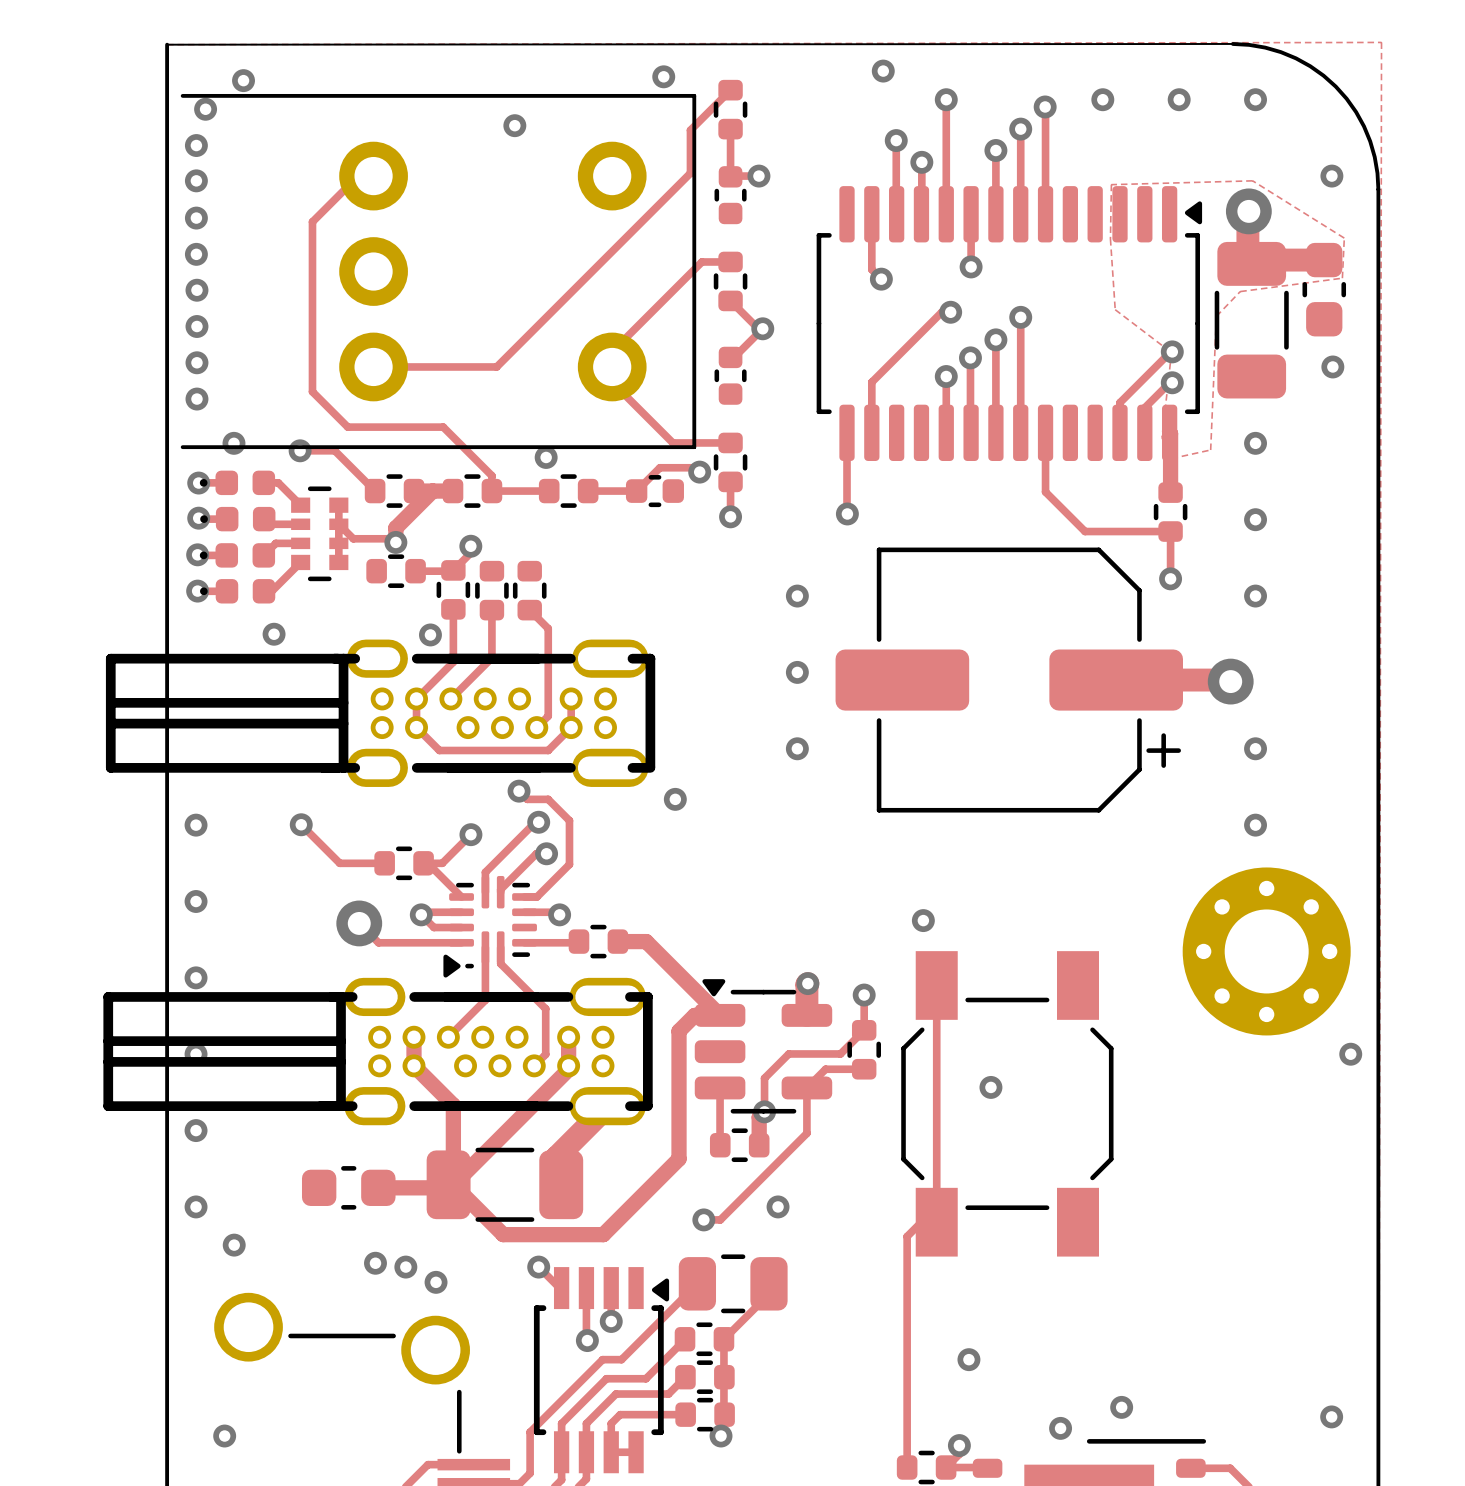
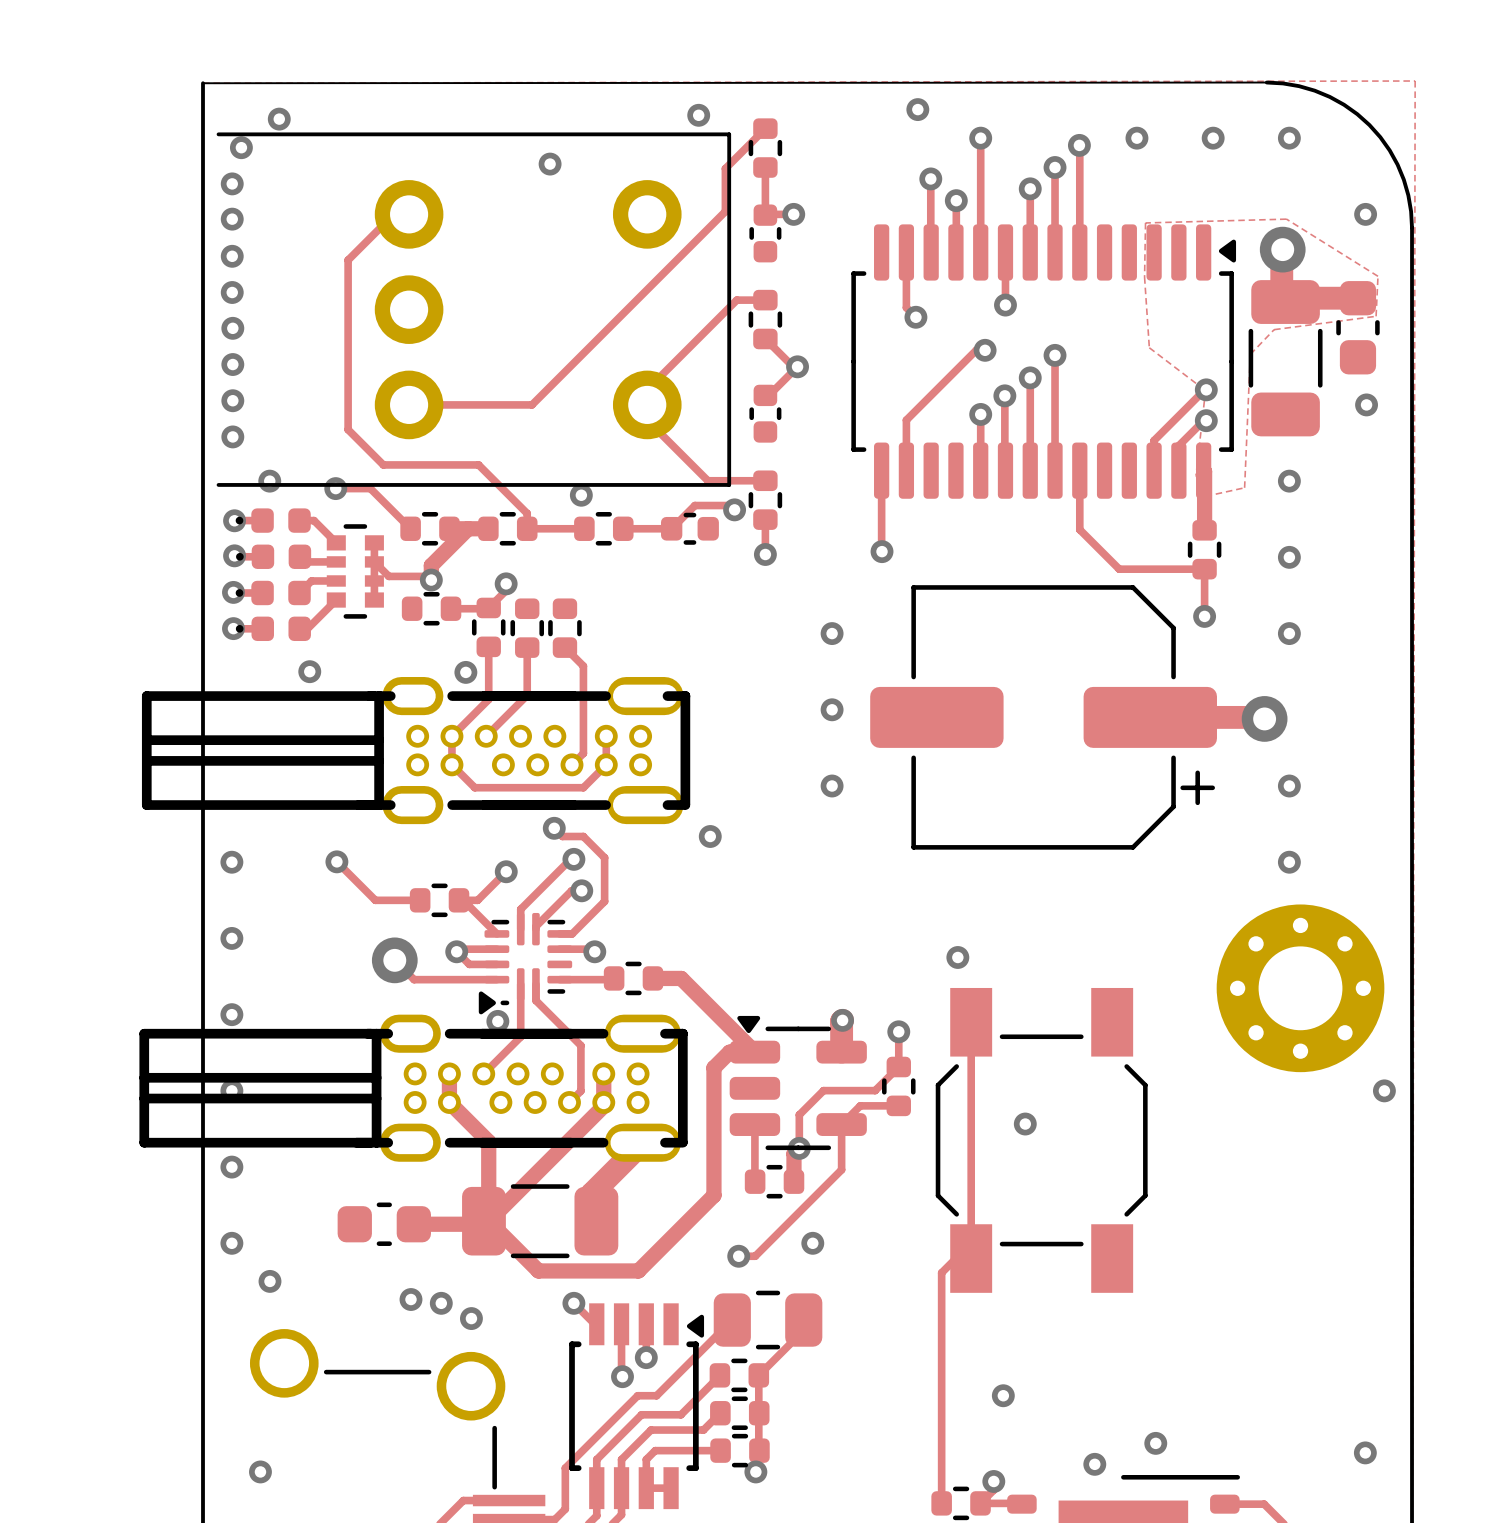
via: none -> (497, 1021)

